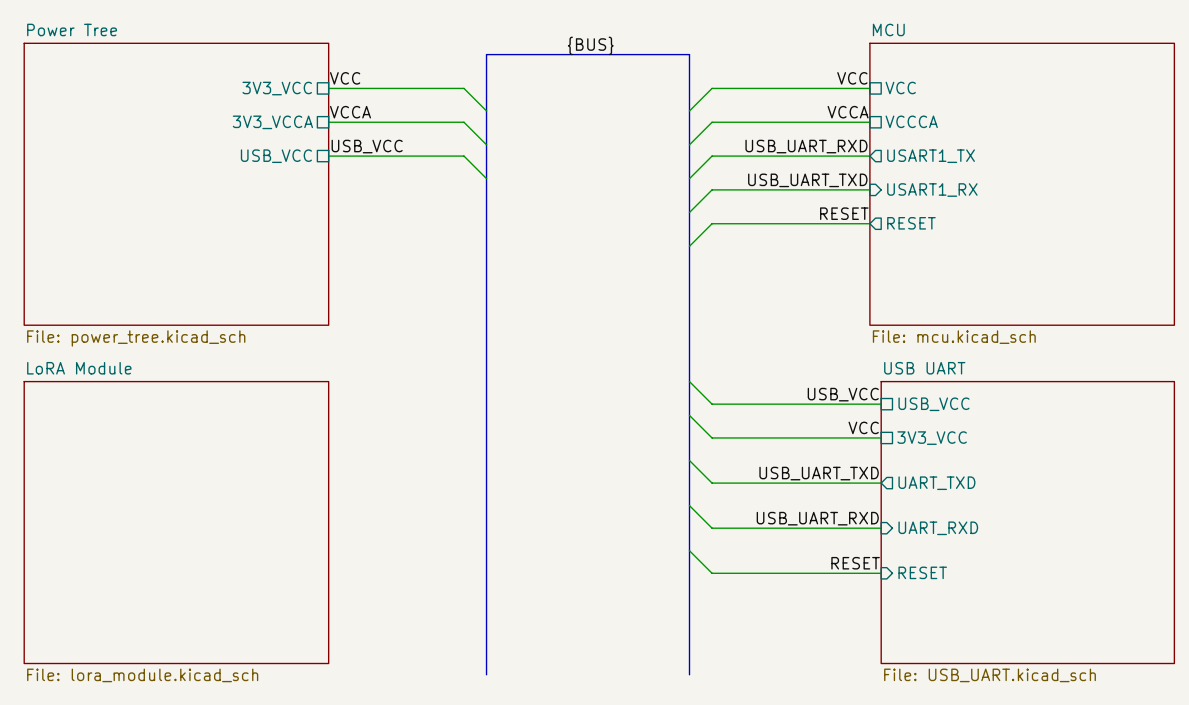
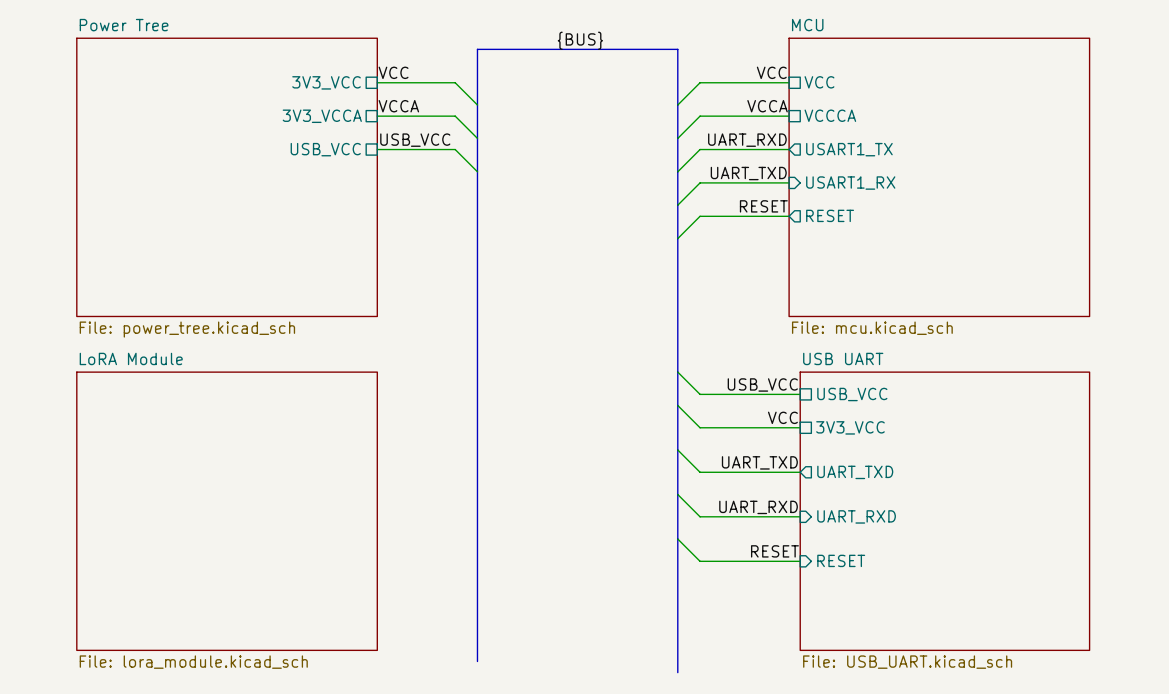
label position: VCC (345, 78) -> VCC (393, 72)
label position: VCC (852, 78) -> VCC (771, 72)
sheet pin position: VCC (900, 87) -> VCC (819, 82)
sheet pin position: 3V3_VCC (277, 88) -> 3V3_VCC (326, 82)
wire: (328, 88) (385, 88) -> none
wire: (802, 88) (869, 88) -> none
label position: VCCA (350, 112) -> VCCA (398, 106)
label position: VCCA (848, 112) -> VCCA (767, 106)
sheet pin position: VCCCA (911, 121) -> VCCCA (830, 115)
sheet pin position: 3V3_VCCA (272, 122) -> 3V3_VCCA (322, 116)
wire: (328, 122) (385, 122) -> none
wire: (802, 122) (869, 122) -> none
label position: USB_VCC (367, 146) -> USB_VCC (415, 140)
label: USB_UART_RXD (806, 146) -> UART_RXD (747, 140)
sheet pin position: USB_VCC (276, 156) -> USB_VCC (325, 149)
wire: (328, 156) (385, 156) -> none
wire: (802, 156) (869, 156) -> none
sheet pin position: USART1_TX (931, 156) -> USART1_TX (849, 149)
label: USB_UART_TXD (807, 180) -> UART_TXD (748, 173)
sheet Power Tree position: (176, 184) -> (227, 177)
sheet MCU position: (1022, 184) -> (939, 177)
wire: (802, 189) (869, 189) -> none
sheet pin position: USART1_RX (932, 190) -> USART1_RX (850, 183)
label position: RESET (844, 213) -> RESET (763, 206)
wire: (802, 223) (869, 223) -> none
sheet pin position: RESET (911, 223) -> RESET (830, 215)
label position: USB_VCC (843, 394) -> USB_VCC (762, 384)
wire: (813, 404) (881, 404) -> none
sheet pin position: USB_VCC (933, 404) -> USB_VCC (852, 394)
label position: VCC (863, 427) -> VCC (782, 417)
wire: (813, 437) (881, 437) -> none
sheet pin position: 3V3_VCC (932, 438) -> 3V3_VCC (850, 427)
label: USB_UART_TXD (819, 473) -> UART_TXD (759, 462)
wire: (813, 483) (881, 483) -> none
sheet pin position: UART_TXD (936, 483) -> UART_TXD (855, 472)
label: USB_UART_RXD (817, 518) -> UART_RXD (758, 507)
sheet LoRA Module position: (176, 522) -> (227, 511)
sheet USB UART position: (1027, 522) -> (944, 511)
wire: (813, 528) (881, 528) -> none
sheet pin position: UART_RXD (938, 528) -> UART_RXD (856, 516)
label position: RESET (855, 563) -> RESET (774, 551)
sheet pin position: RESET (922, 572) -> RESET (841, 560)
wire: (813, 573) (881, 573) -> none
bus: none -> (677, 661) (677, 672)

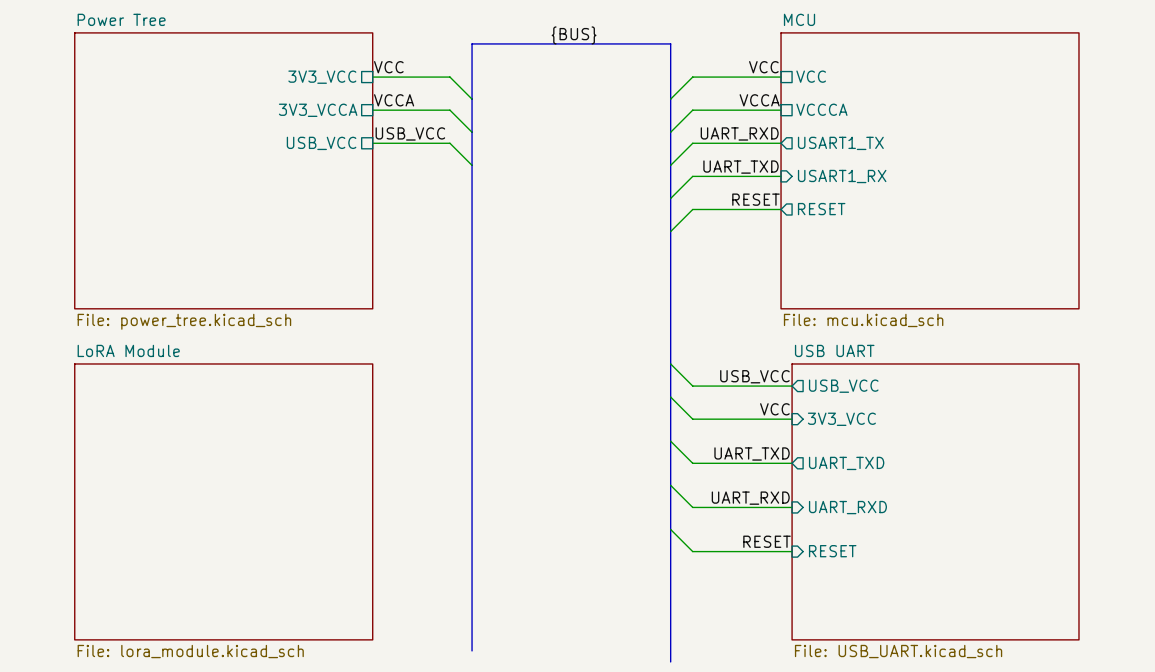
sheet pin shape: passive (852, 394) -> output (843, 386)
sheet pin shape: passive (850, 427) -> input (841, 419)

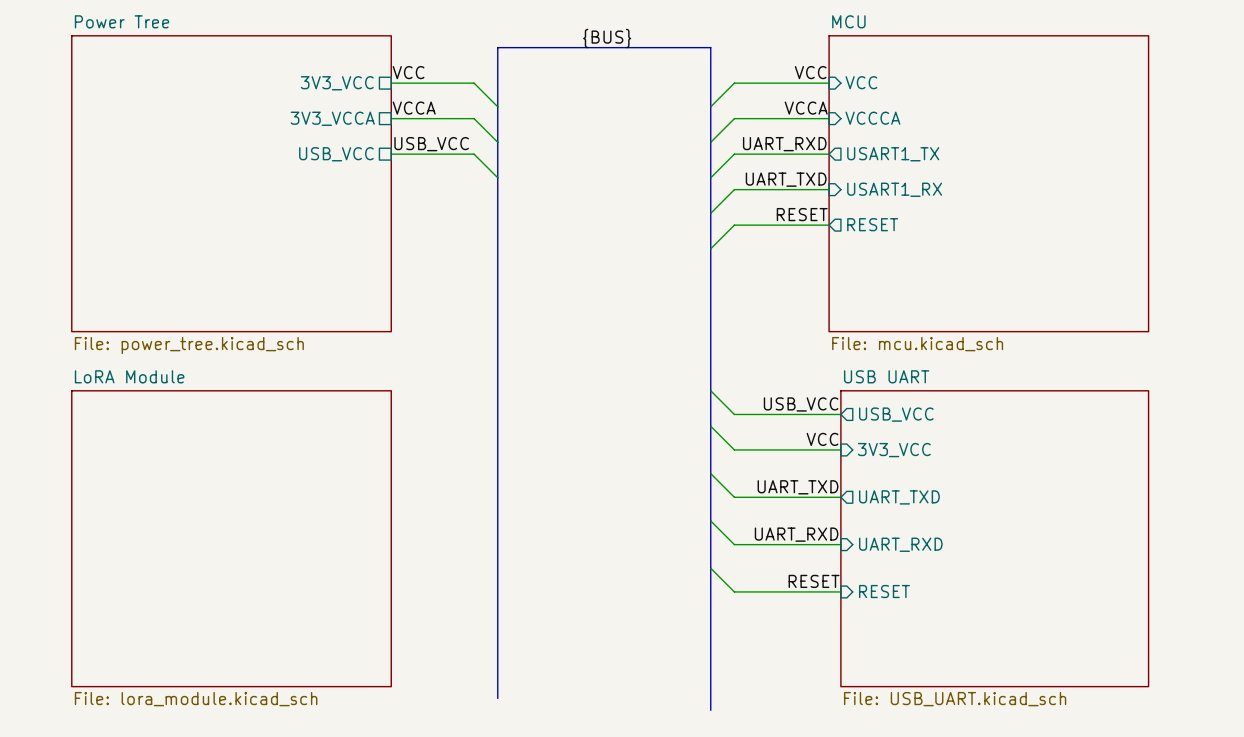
sheet pin shape: passive (811, 76) -> input (861, 82)
sheet pin shape: passive (821, 109) -> input (872, 118)

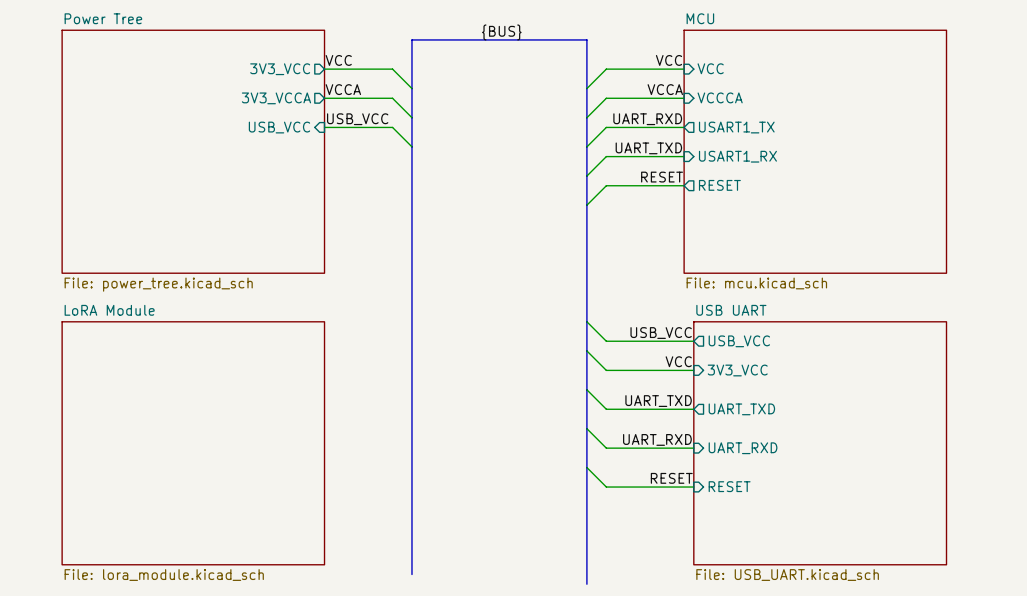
sheet pin shape: passive (337, 83) -> output (280, 69)
sheet pin shape: passive (332, 118) -> output (276, 98)
sheet pin shape: passive (336, 154) -> input (279, 127)

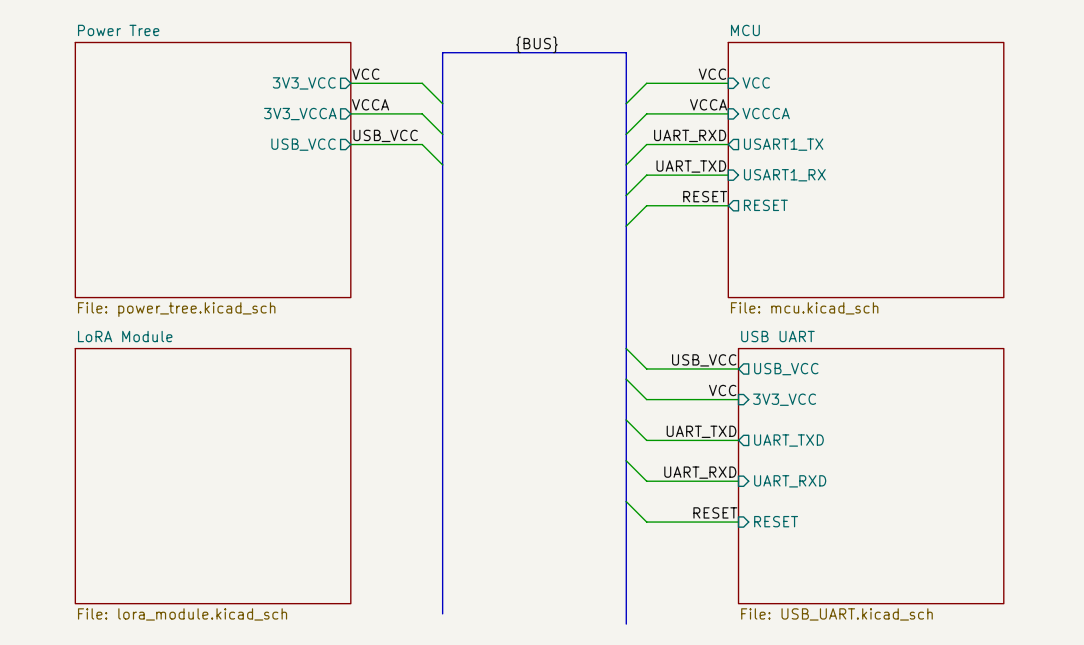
sheet pin shape: input (279, 127) -> output (303, 144)

